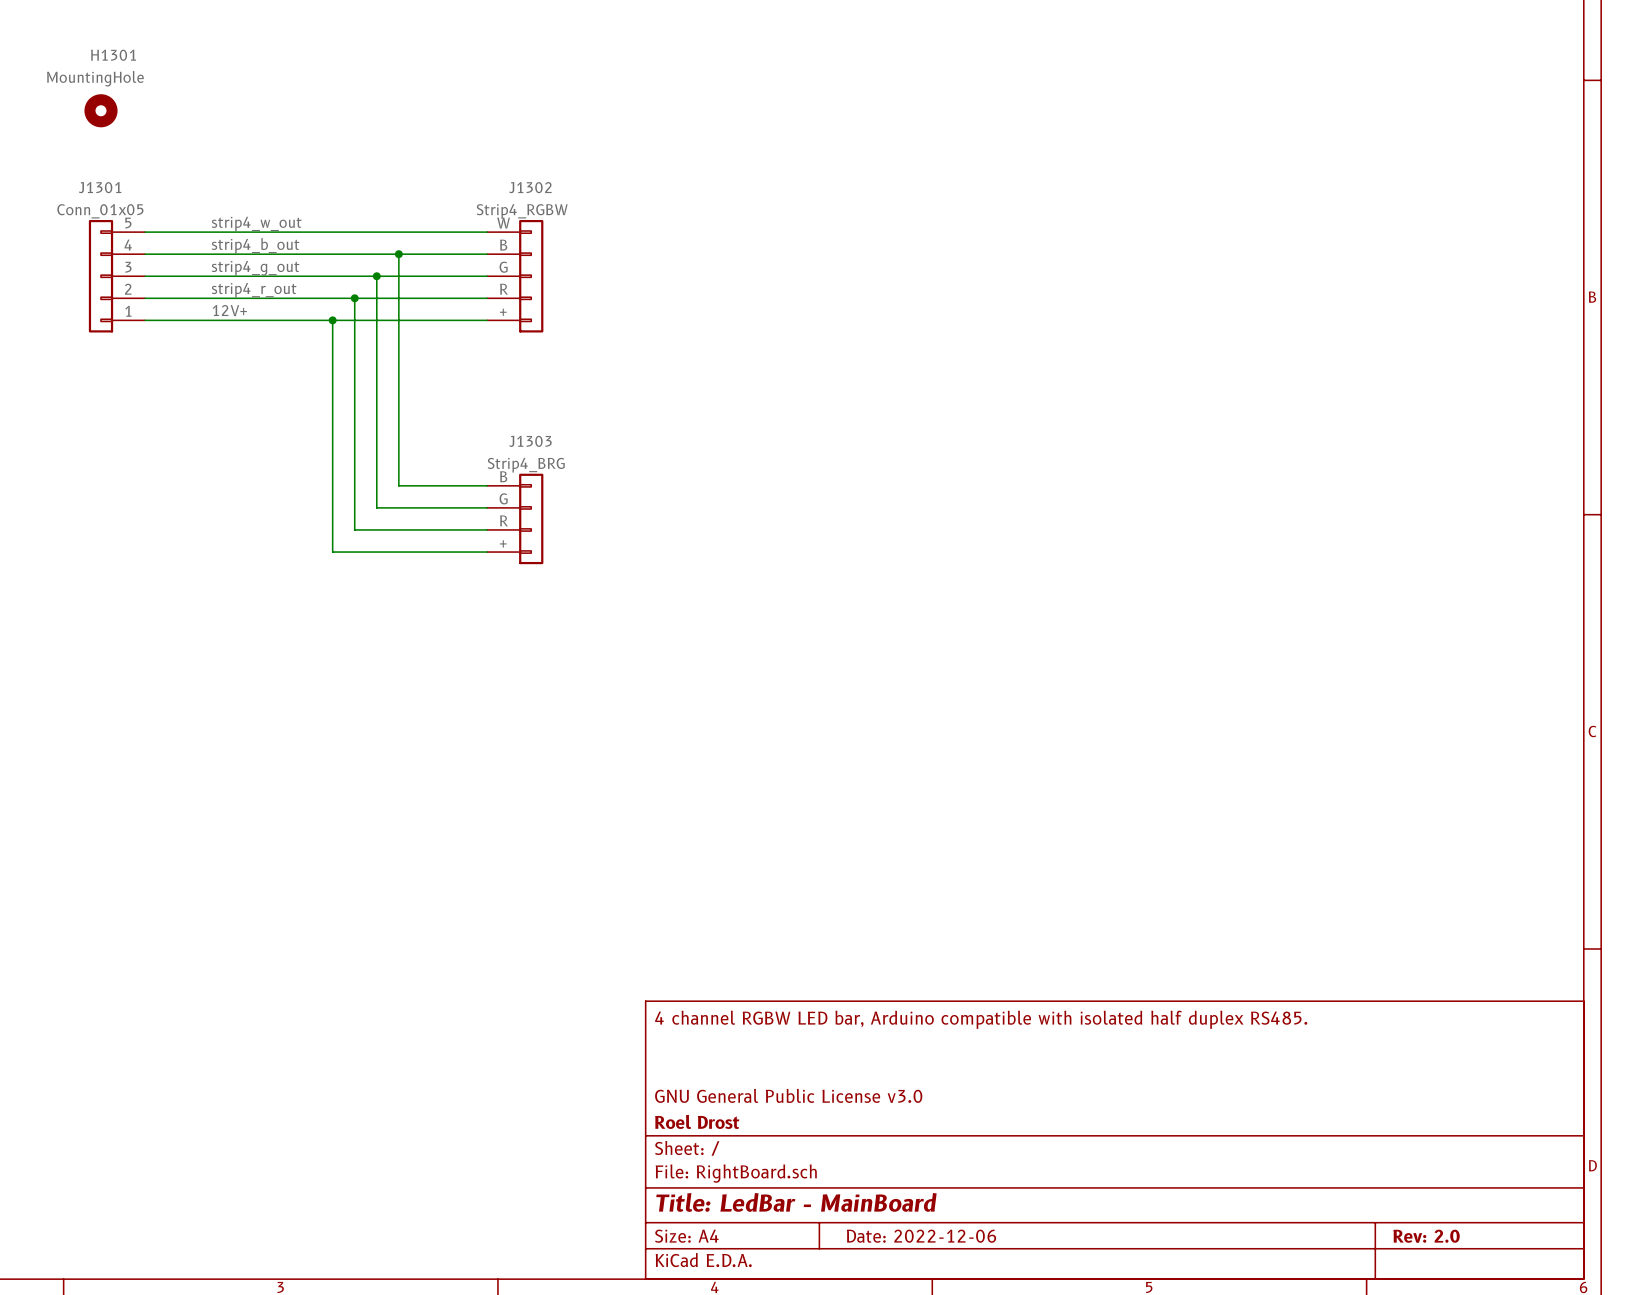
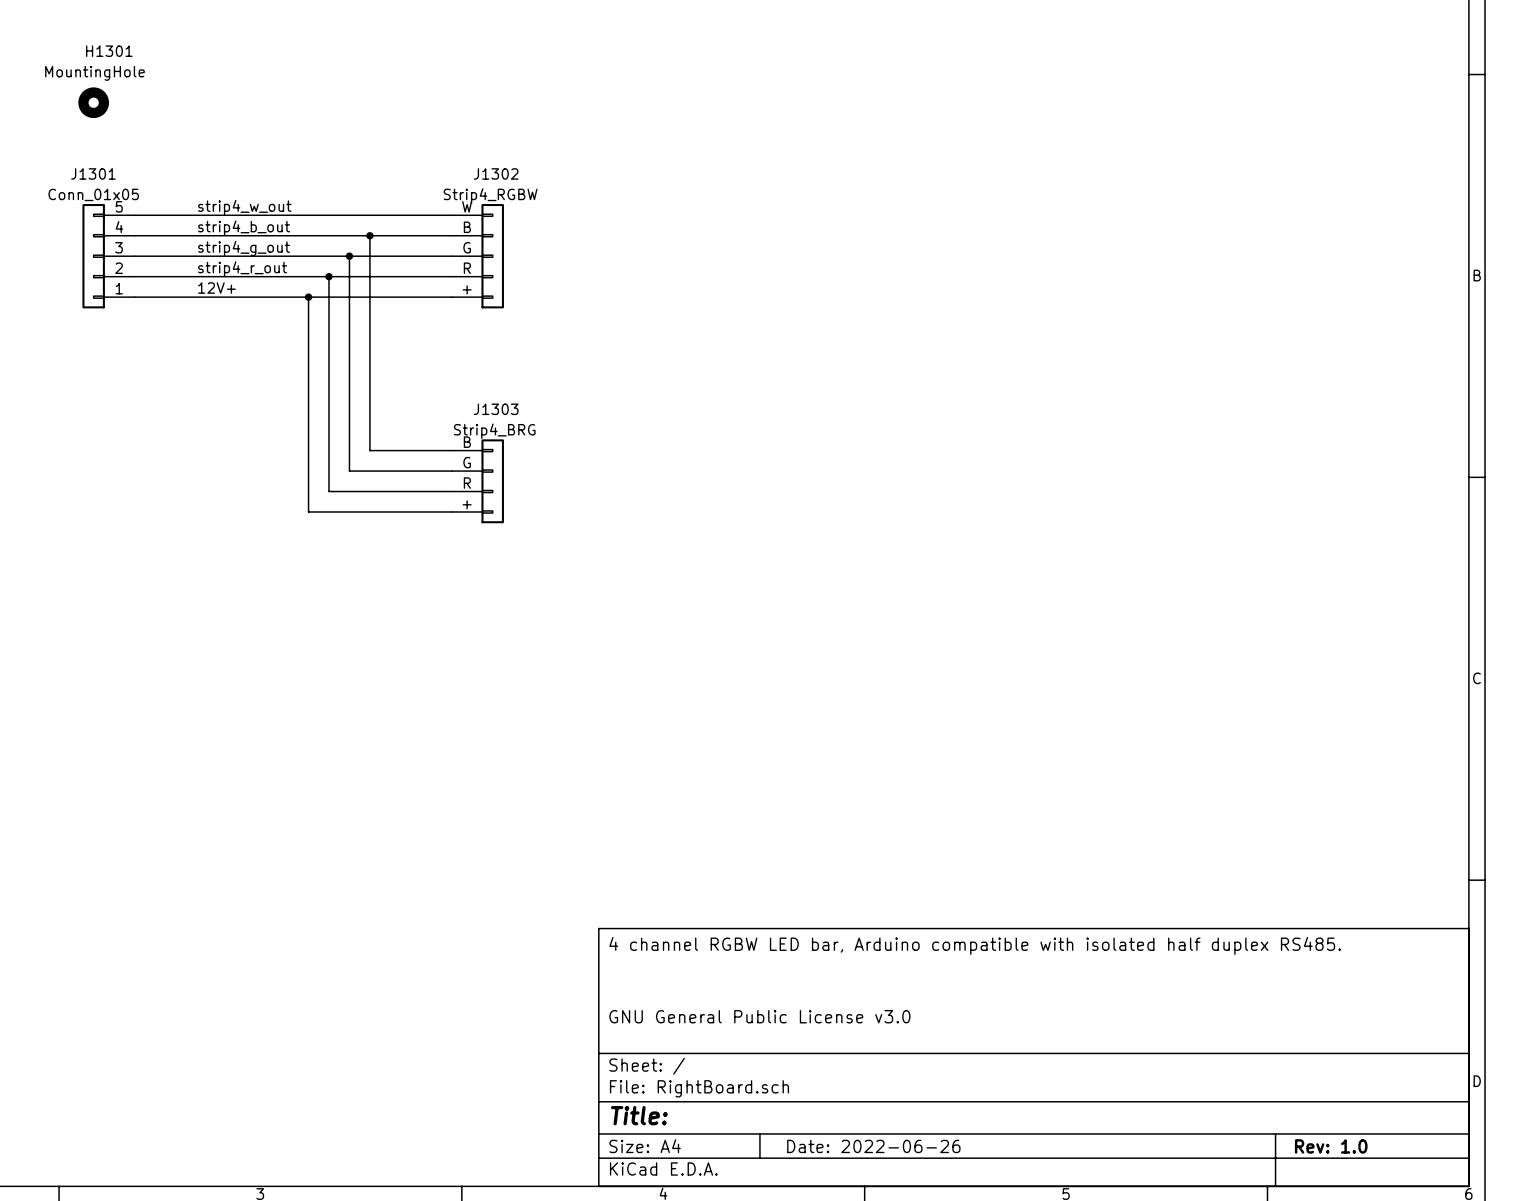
title block: Roel Drost (697, 1121) -> none
title block: Title: LedBar - MainBoard (796, 1202) -> Title: (639, 1115)
title block: Date: 2022-12-06 (921, 1236) -> Date: 2022-06-26 (873, 1146)
title block: Rev: 2.0 (1426, 1236) -> Rev: 1.0 (1331, 1146)

